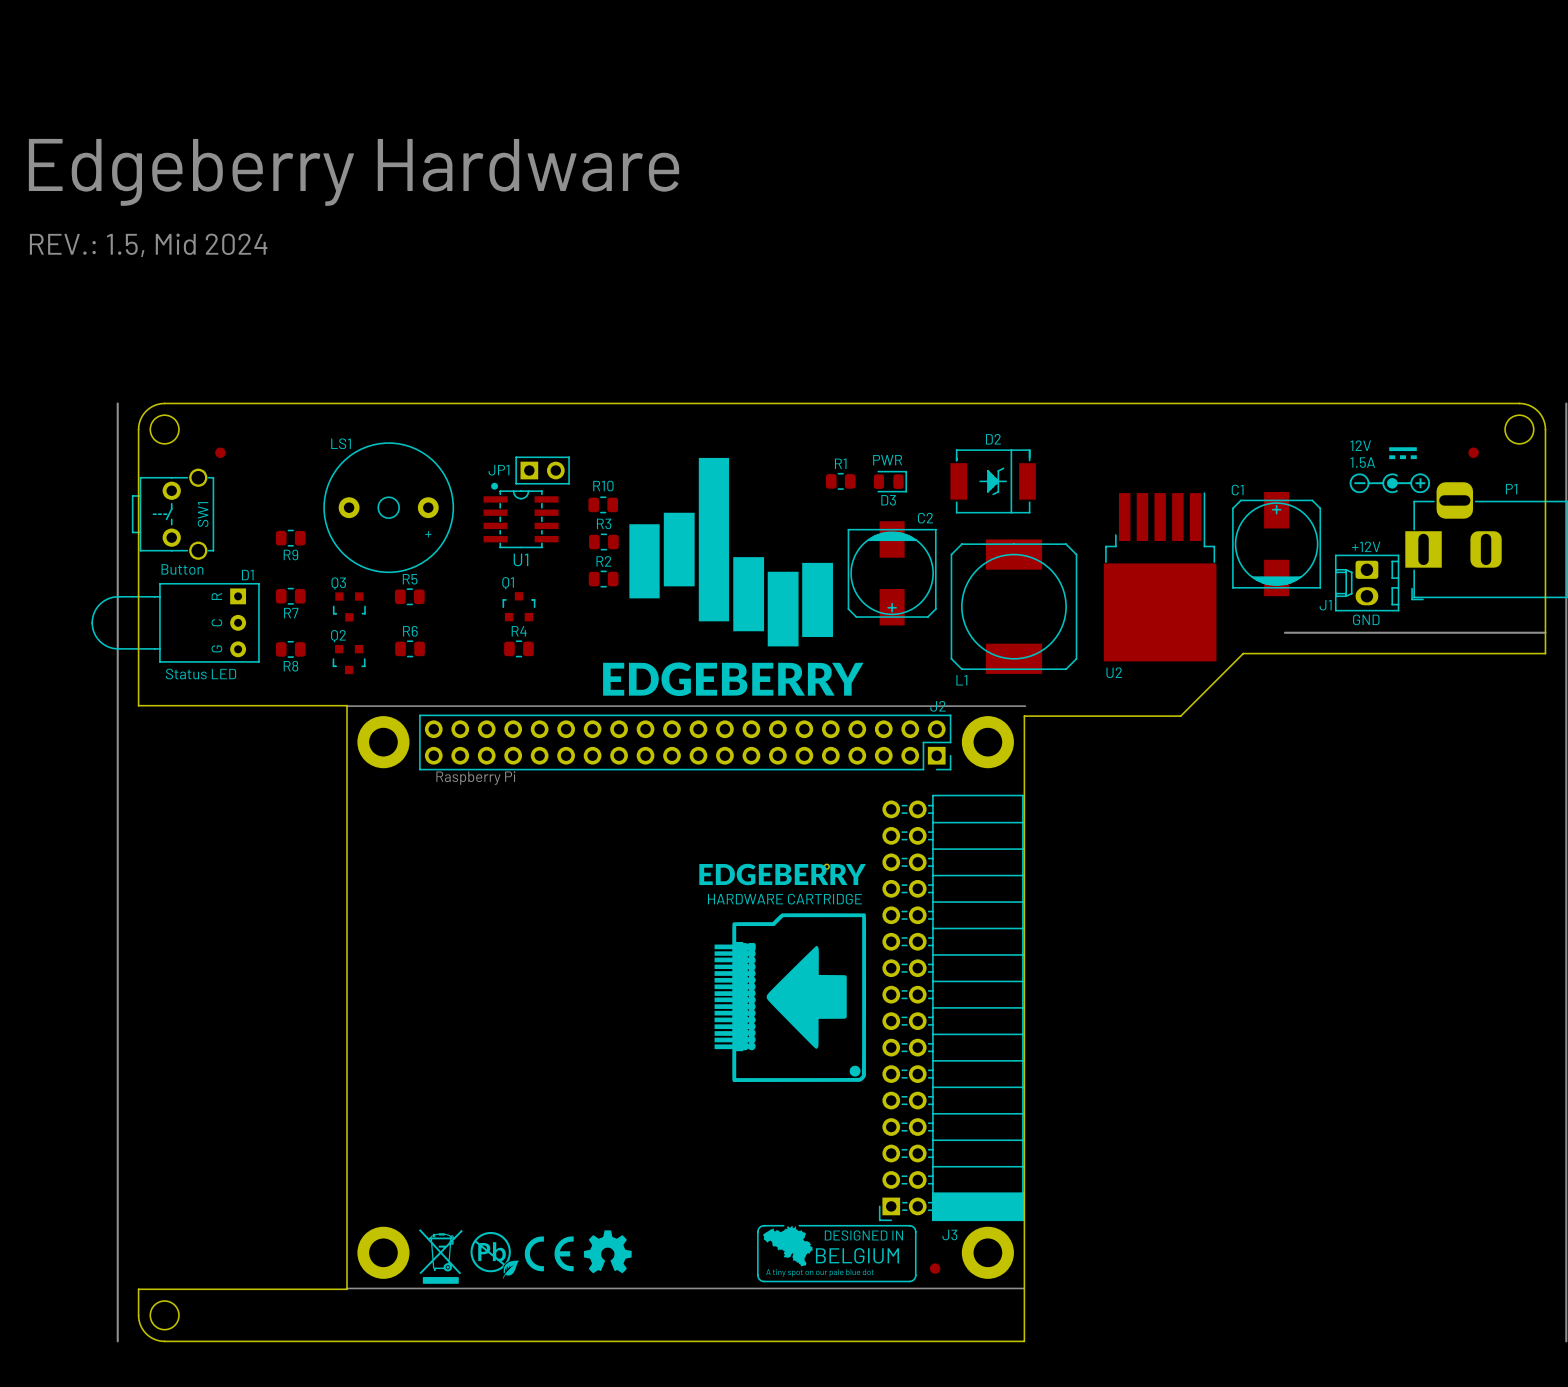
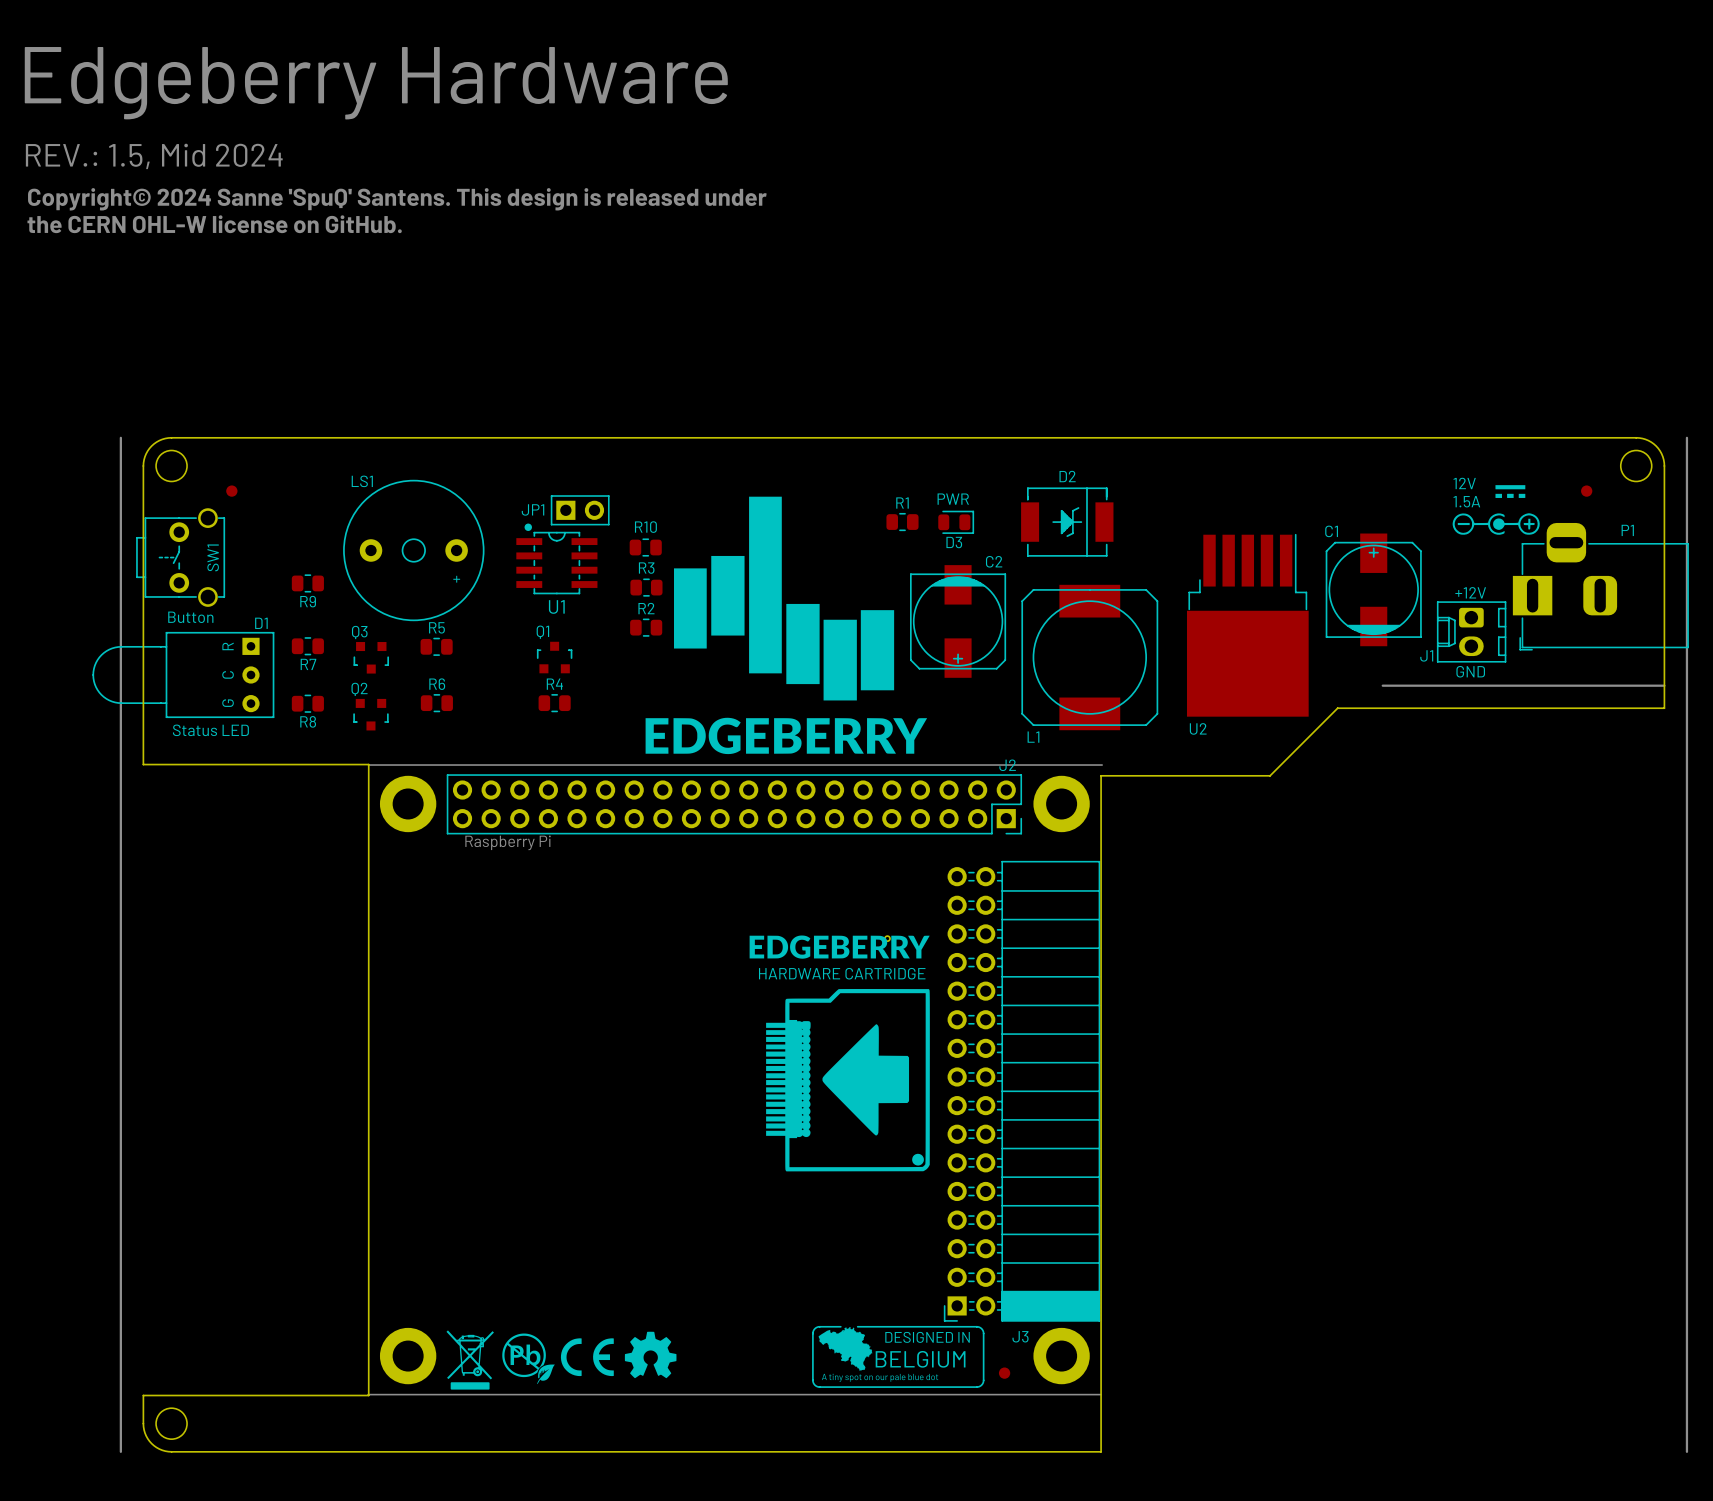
text position: Edgeberry Hardware (354, 172) -> Edgeberry Hardware (376, 83)
text: none -> Copyright© 2024 Sanne 'SpuQ' Santens. This design is released under (397, 199)
text: none -> the CERN OHL-W license on GitHub. (214, 224)
text position: REV.: 1.5, Mid 2024 (148, 245) -> REV.: 1.5, Mid 2024 (154, 156)

